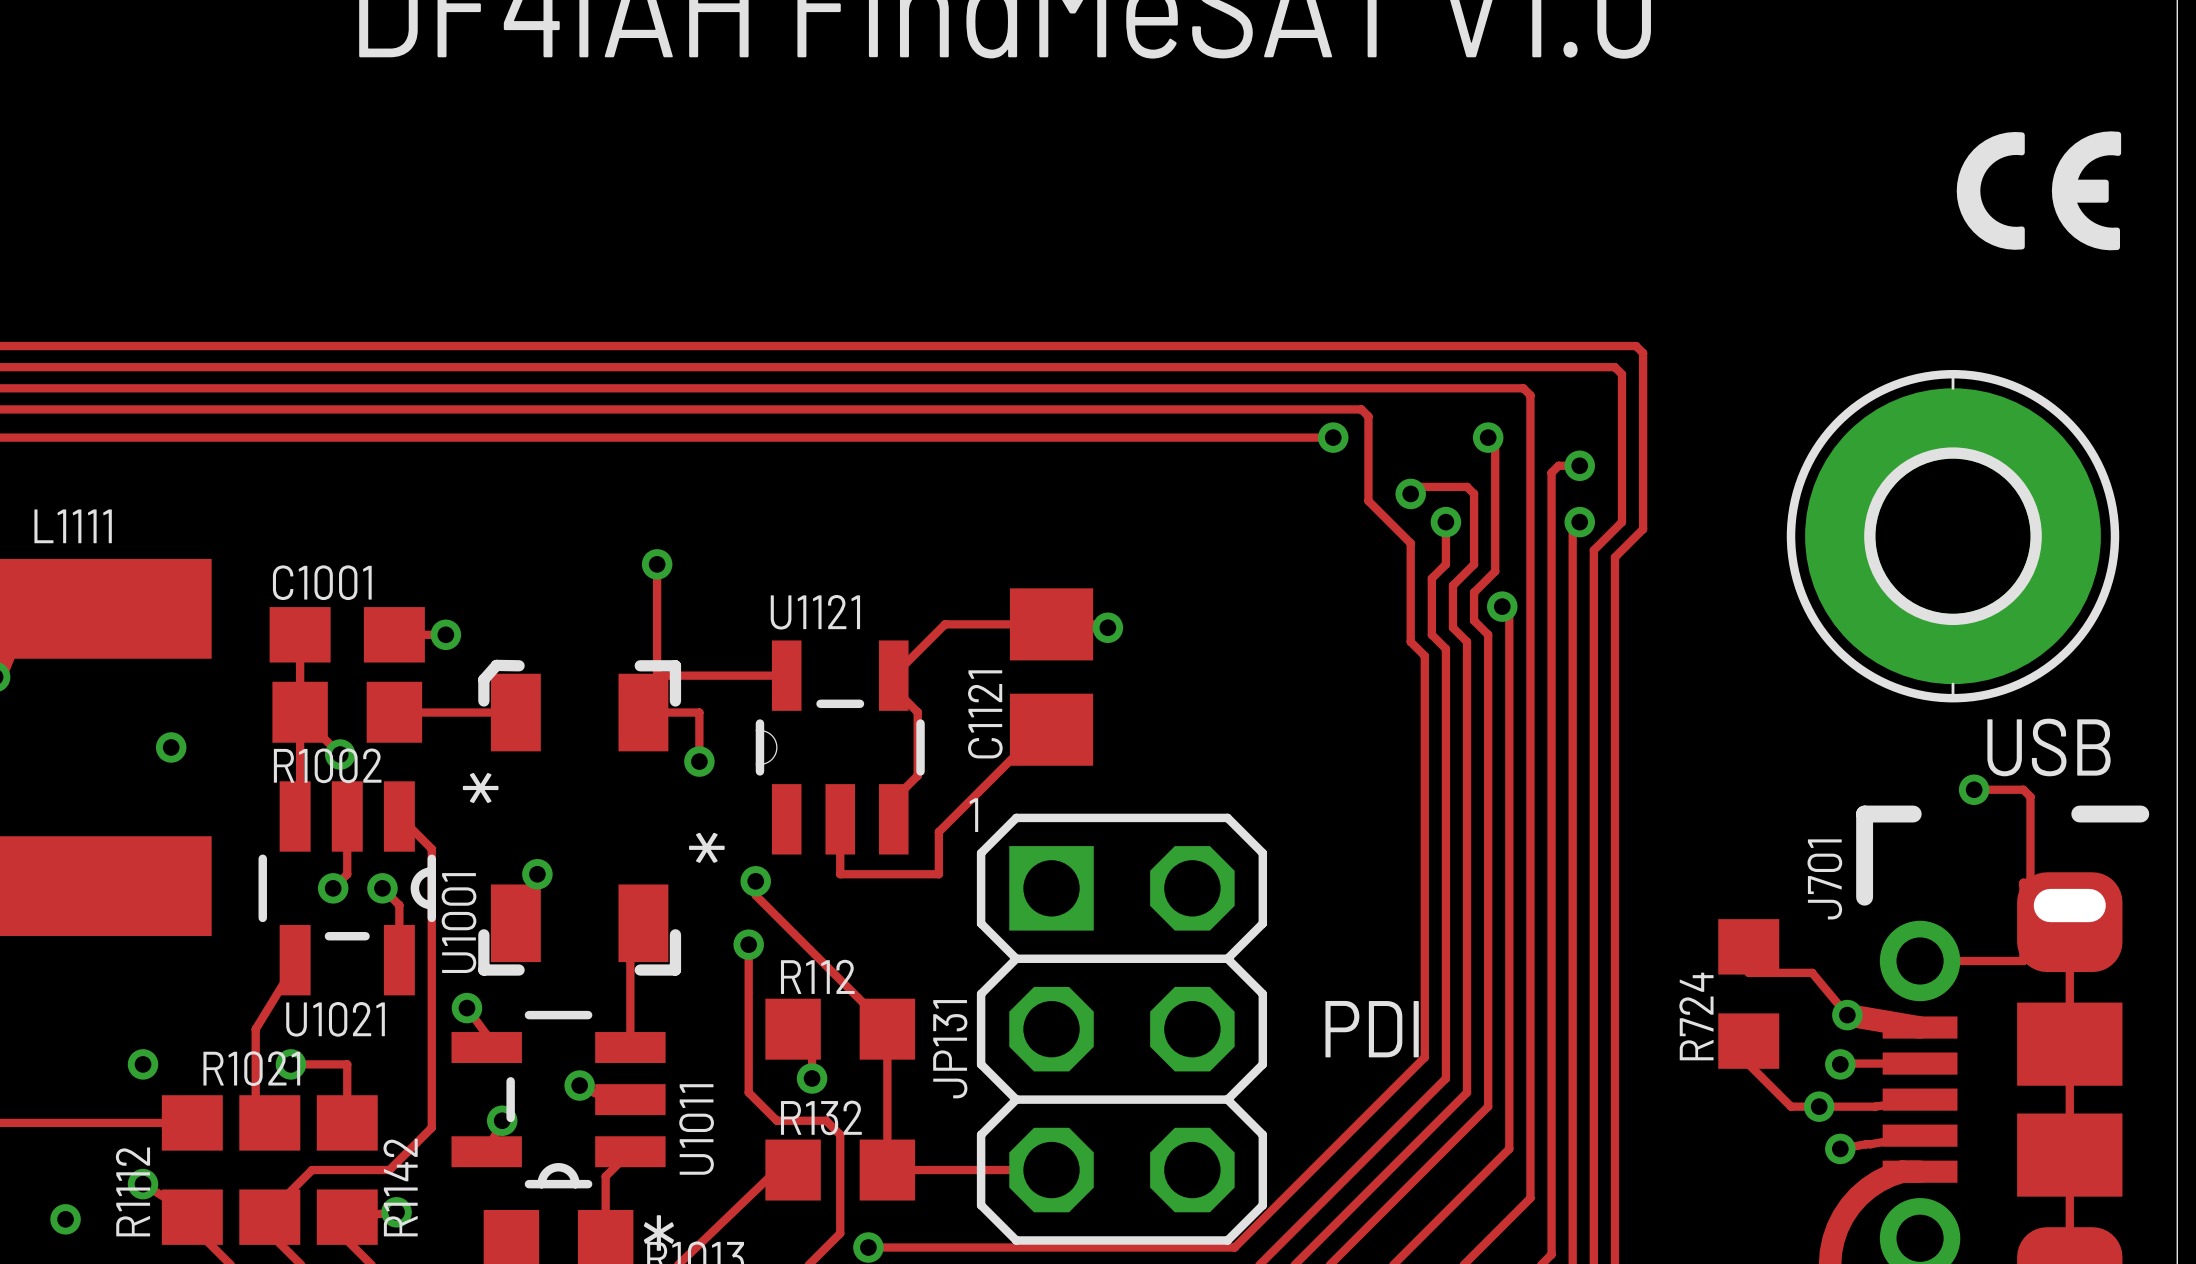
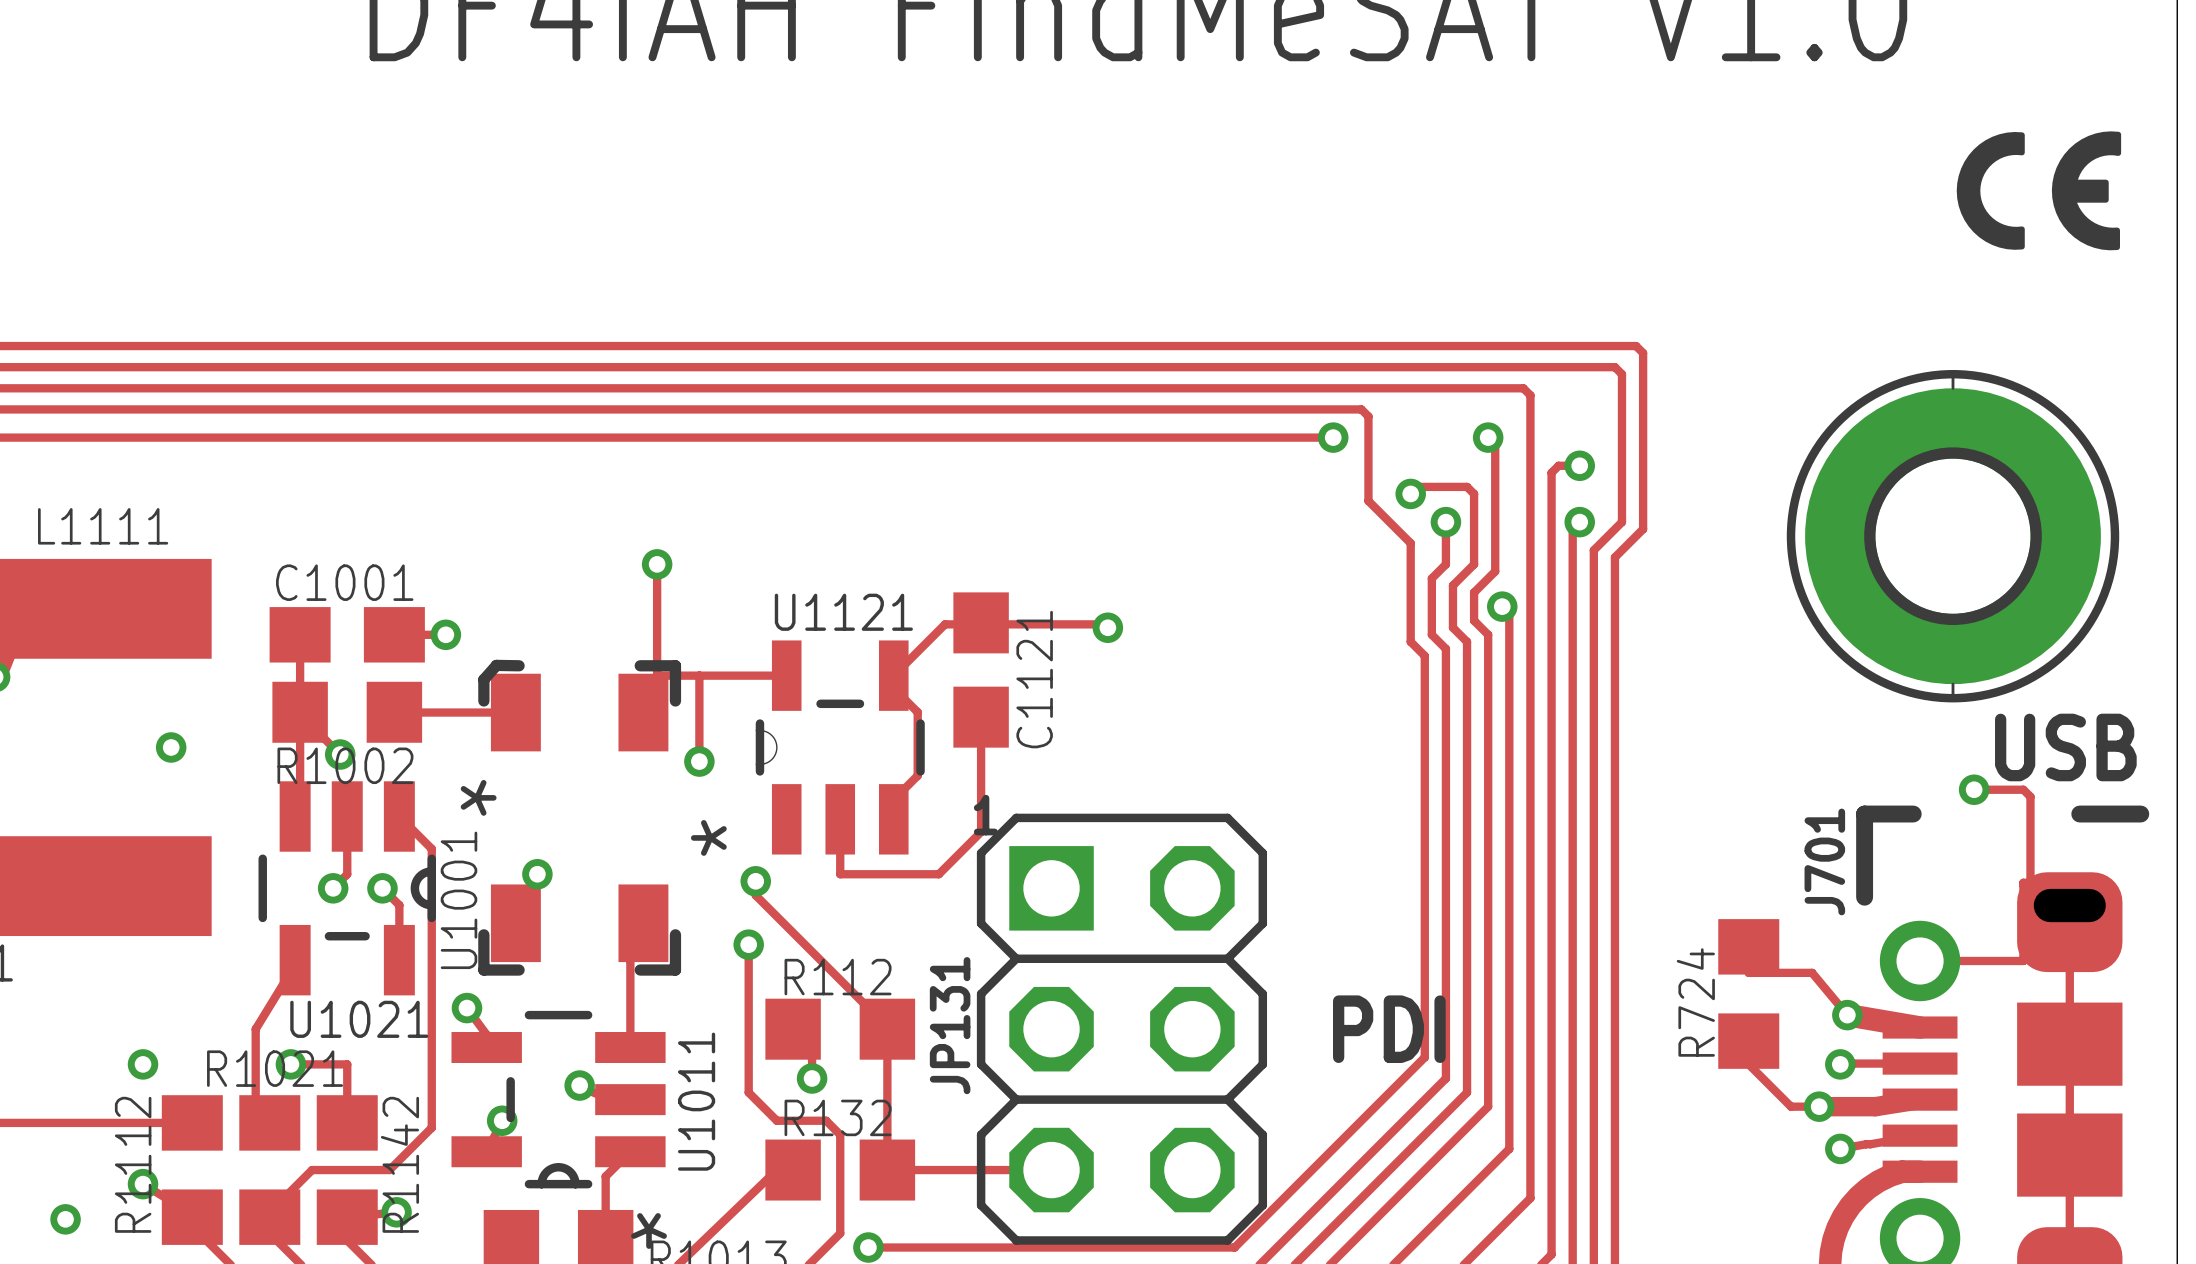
C1121 footprint: [1009, 588, 1094, 766] -> [953, 592, 1009, 748]
track: (643, 712) (699, 712) -> (699, 675) (699, 712)
C1121 name position: C1121 (985, 714) -> C1121 (1034, 679)
track: (1051, 729) (1041, 729) (938, 831) (938, 874) -> (981, 717) (981, 831) (938, 874)
track width: thin (1920, 1099) (1875, 1106) (1819, 1106) -> thick (1920, 1099) (1875, 1106) (1819, 1106)

